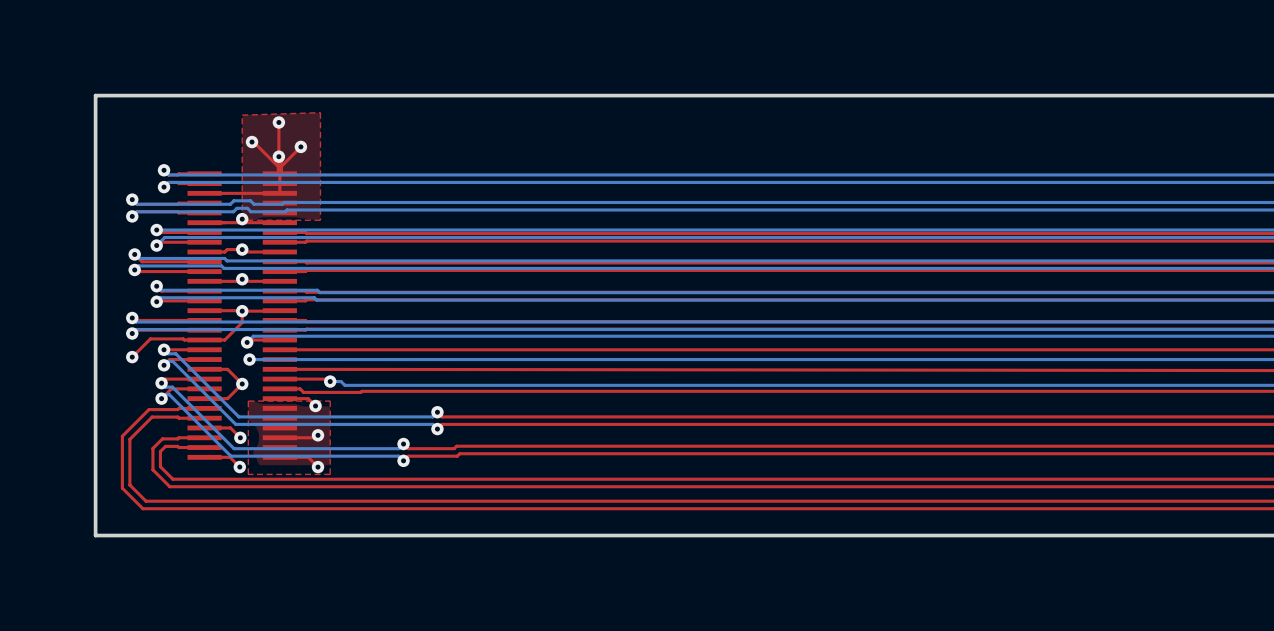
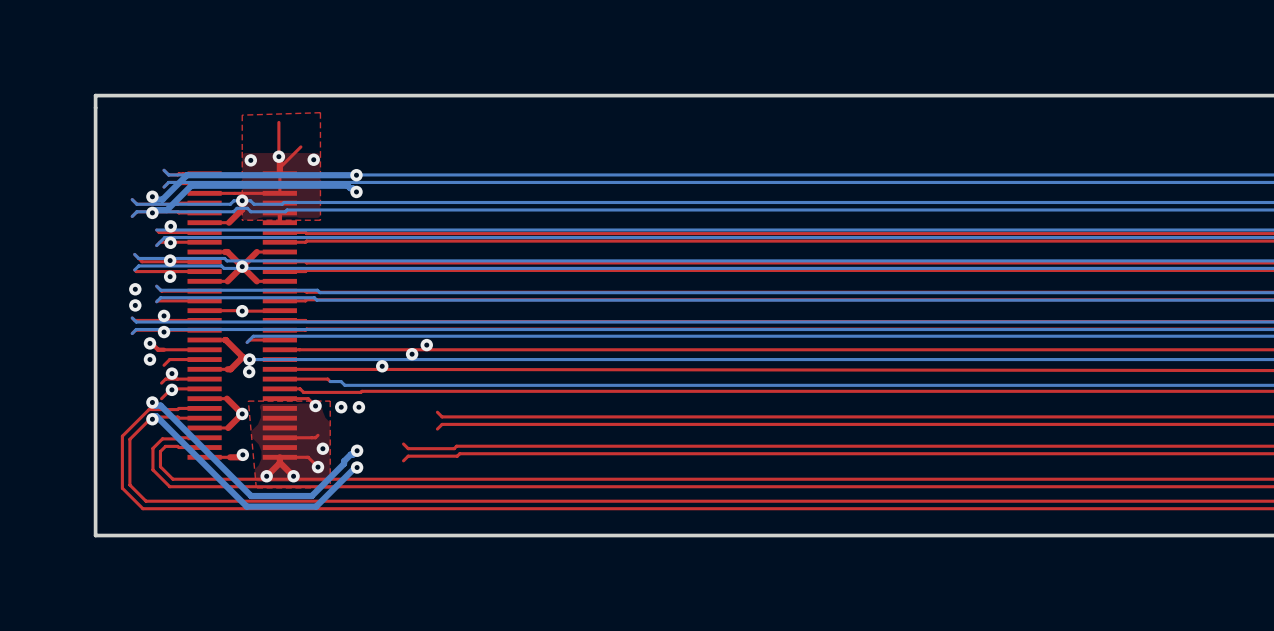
via: (278, 122) -> none
top track: (252, 142) (279, 168) -> none
via position: (252, 142) -> (250, 160)
via position: (300, 146) -> (313, 159)
via: (164, 170) -> none
bottom track: none -> (356, 175) (186, 175) (162, 199) (155, 199) (152, 196)
via: none -> (356, 175)
via position: (164, 187) -> (152, 196)
bottom track: none -> (356, 191) (347, 185) (191, 185) (166, 210) (155, 210) (152, 212)
via: none -> (356, 191)
via: (132, 199) -> none
via: none -> (152, 212)
top track: none -> (279, 212) (279, 222)
via: (132, 216) -> none
via position: (242, 219) -> (242, 200)
top track: (279, 222) (245, 222) (242, 219) (238, 222) (229, 222) -> (242, 200) (242, 209) (229, 222)
via: none -> (170, 226)
via: (156, 230) -> none
via: none -> (170, 242)
via: (156, 245) -> none
via: (242, 249) -> none
top track: (256, 252) (244, 252) (242, 249) (227, 249) (224, 252) -> (256, 281) (227, 252) (224, 252)
via: (134, 254) -> none
via: none -> (170, 260)
via: none -> (242, 266)
via: (134, 269) -> none
via: none -> (170, 276)
via: (242, 279) -> none
top track: (256, 281) (244, 281) (242, 279) (240, 281) (227, 281) -> (256, 252) (227, 281)
via: (156, 286) -> none
via: none -> (135, 289)
via: (156, 301) -> none
via: none -> (135, 305)
top track: (242, 311) (242, 322) (224, 340) -> none
via: none -> (164, 315)
via: (132, 318) -> none
via: none -> (164, 332)
via: (132, 333) -> none
top track: (204, 340) (150, 338) (132, 357) -> none
via: (247, 342) -> none
top track: none -> (149, 343) (158, 349) (164, 349)
via: none -> (149, 343)
via: none -> (426, 345)
bottom track: (164, 349) (168, 353) (175, 353) (238, 416) (432, 416) (437, 412) -> none
via: (164, 349) -> none
via: none -> (412, 354)
via: (132, 357) -> none
via: none -> (149, 359)
bottom track: (164, 365) (168, 361) (172, 361) (235, 424) (432, 424) (437, 429) -> none
via: (164, 365) -> none
via: none -> (382, 366)
top track: (227, 369) (242, 383) (226, 398) -> (227, 369) (230, 369) (242, 357) (224, 340)
via: none -> (171, 373)
via: (330, 381) -> none
bottom track: (161, 383) (165, 387) (172, 387) (234, 448) (398, 448) (403, 444) -> none
via: (161, 383) -> none
via position: (242, 383) -> (249, 371)
via: none -> (171, 389)
bottom track: (161, 398) (165, 394) (169, 394) (230, 456) (398, 456) (403, 460) -> none
via: (161, 398) -> none
top zone outline: (248, 401) (248, 474) (330, 474) -> (248, 401) (256, 487) (330, 487) (330, 474)
bottom track: none -> (152, 402) (155, 405) (160, 405) (251, 496) (311, 496) (350, 454) (357, 450)
via: none -> (152, 402)
via: none -> (341, 407)
via: none -> (358, 407)
via: (437, 412) -> none
via: none -> (242, 413)
bottom track: none -> (152, 419) (156, 416) (246, 506) (316, 506) (357, 467)
via: none -> (152, 419)
top track: (228, 427) (240, 437) -> (228, 427) (242, 413) (226, 398)
via: (437, 429) -> none
via position: (318, 435) -> (322, 448)
via: (240, 437) -> none
via: (403, 444) -> none
via: none -> (357, 450)
top track: (230, 457) (239, 467) -> none
top track: none -> (240, 457) (230, 457) (240, 457)
top track: none -> (279, 457) (279, 463) (266, 476)
via: (403, 460) -> none
top track: none -> (279, 462) (293, 476)
via position: (239, 467) -> (242, 454)
via: none -> (357, 467)
via: none -> (266, 476)
via: none -> (293, 476)

